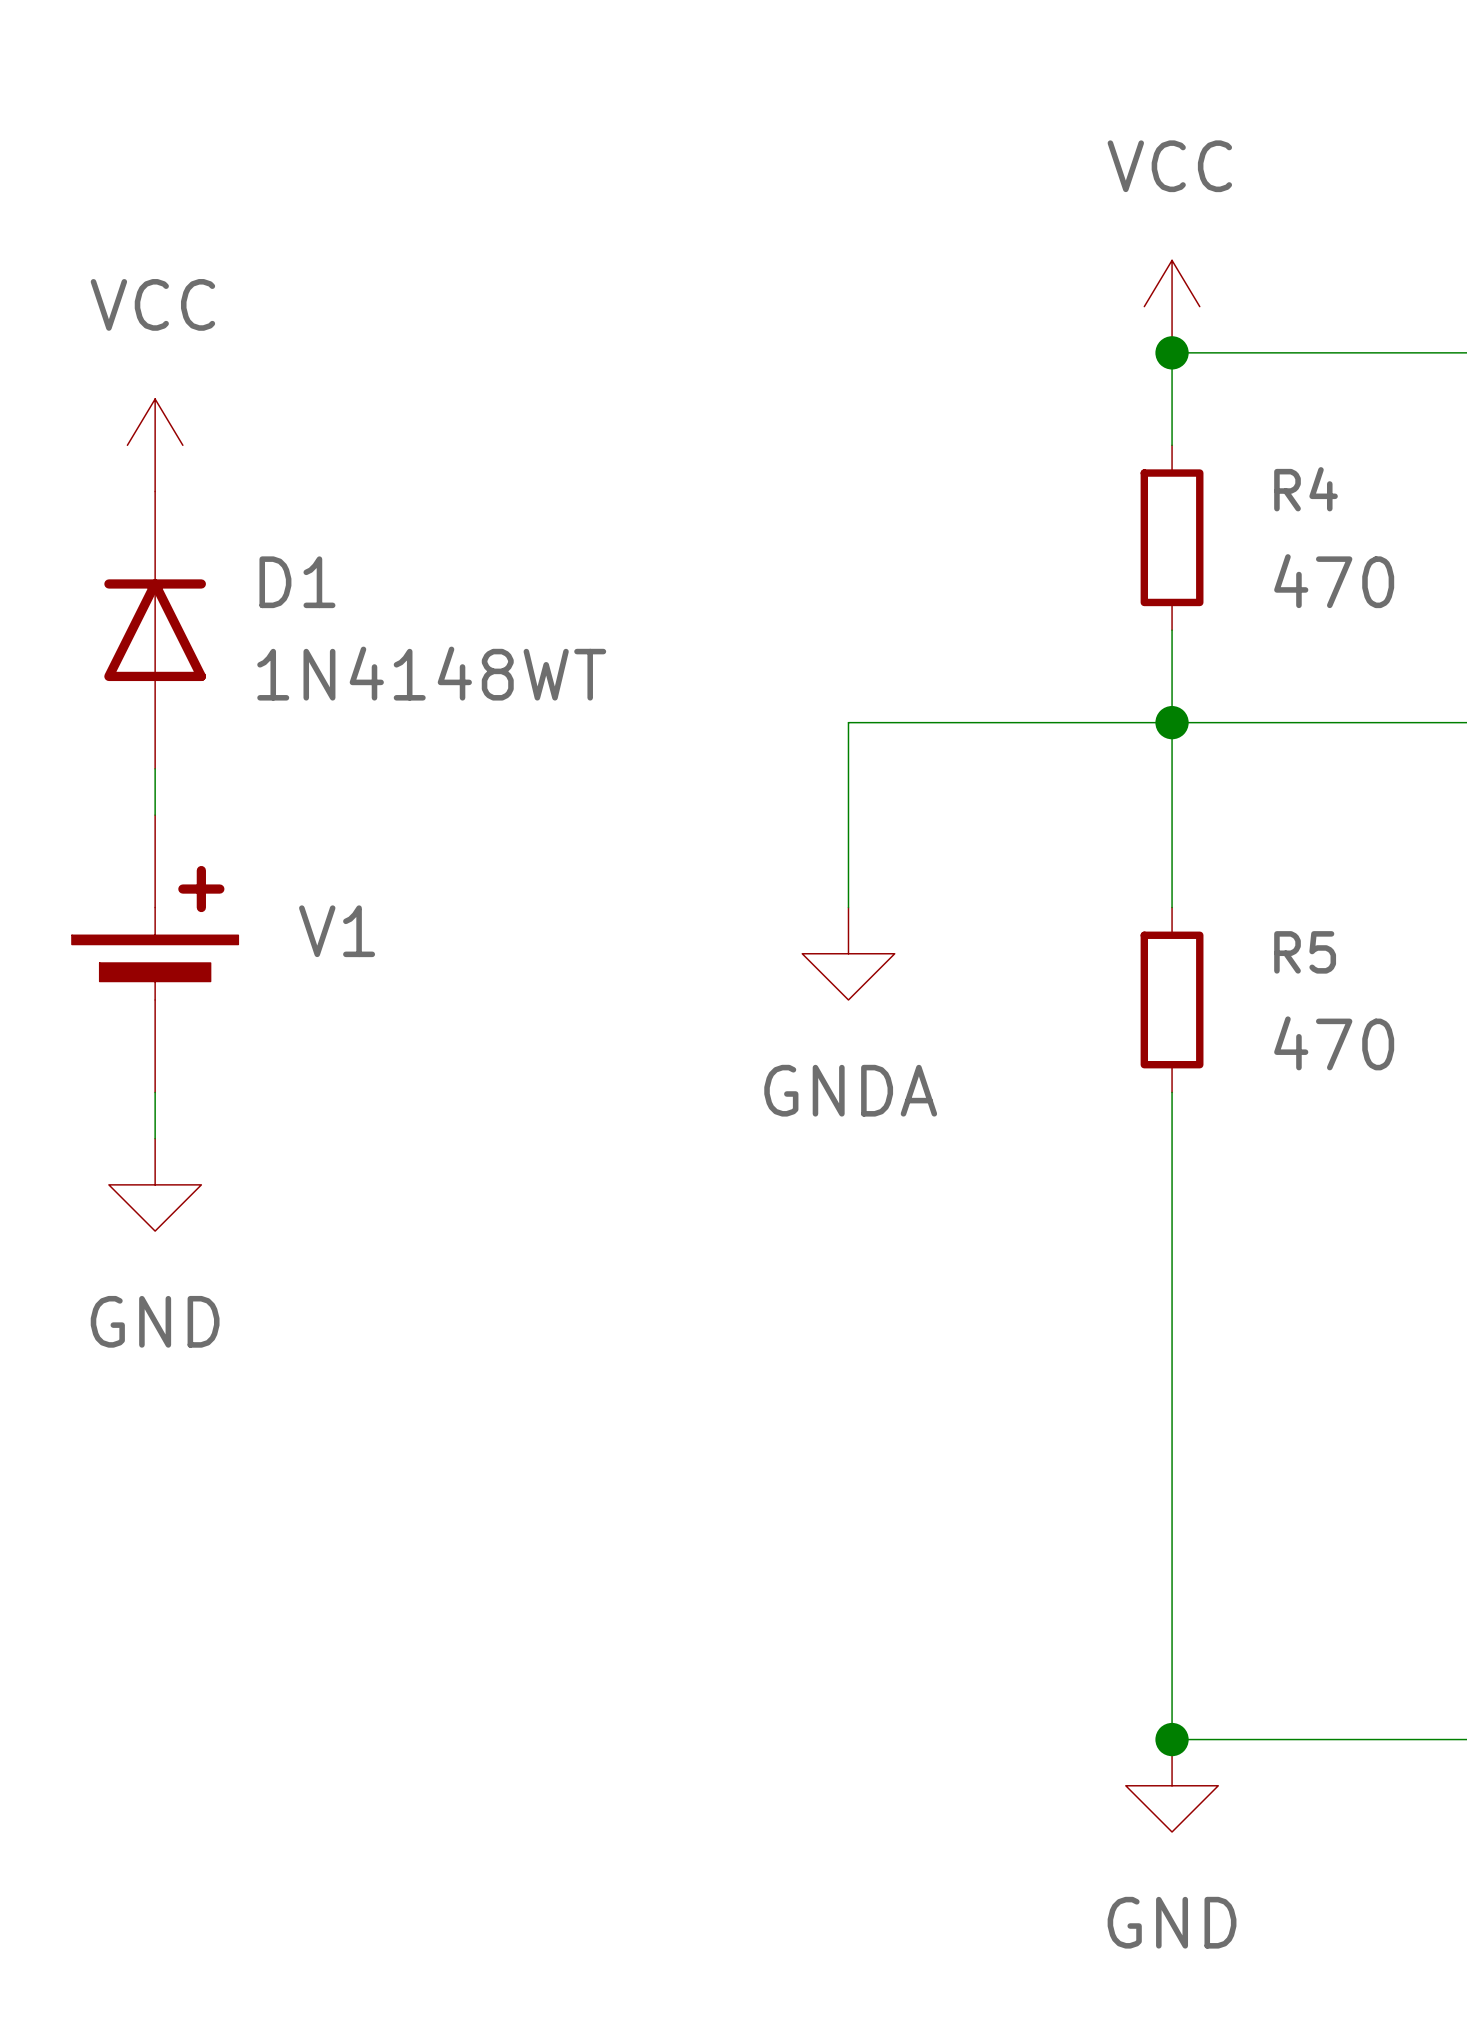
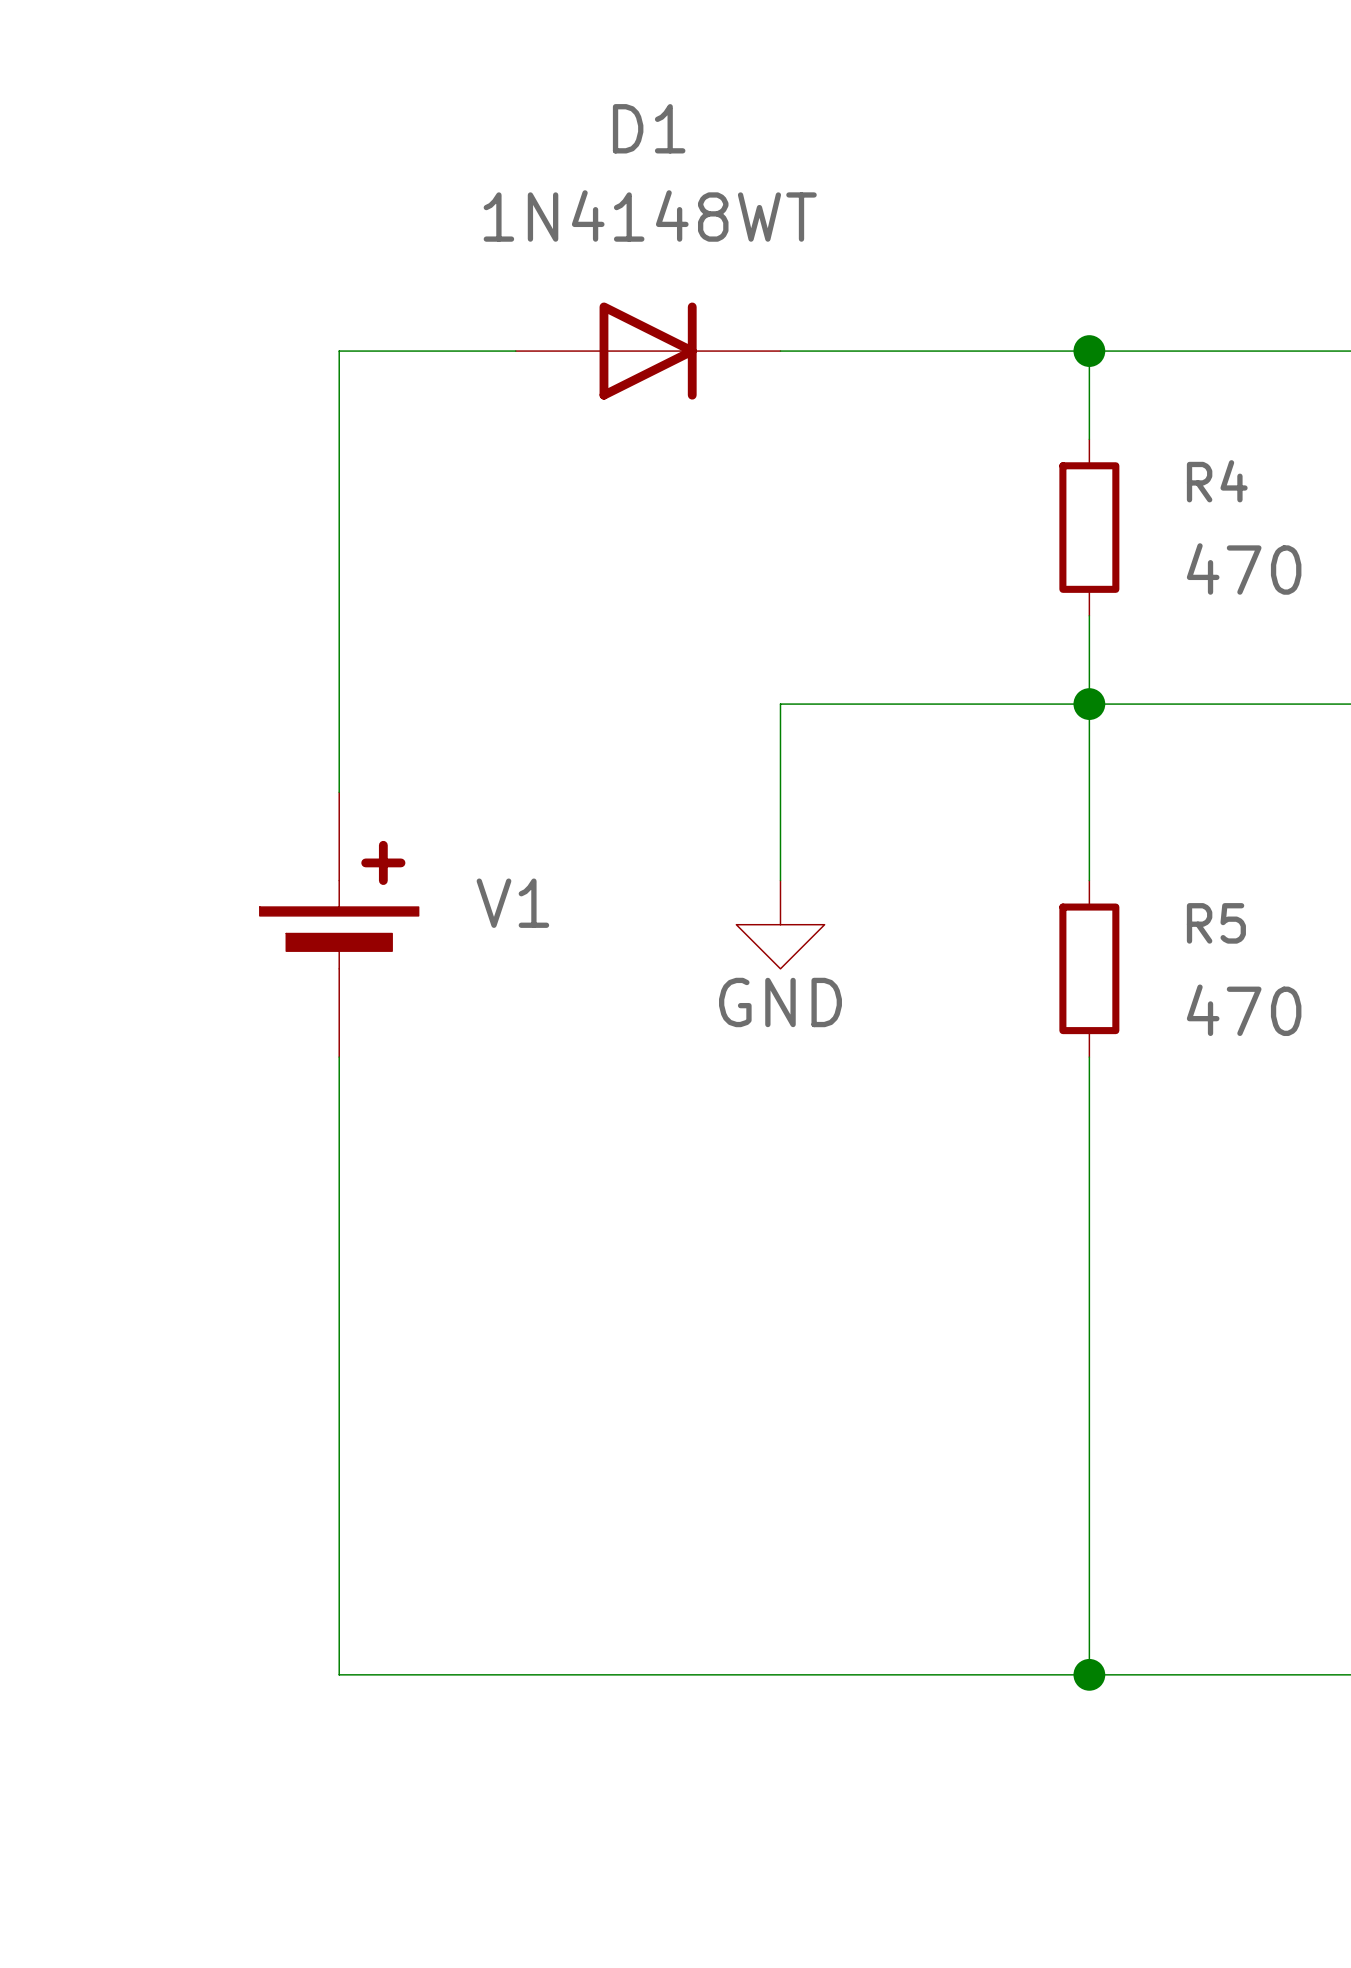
power symbol: VCC (1172, 306) -> none
wire: none -> (515, 351) (339, 351) (339, 792)
wire: none -> (780, 351) (1089, 351)
power symbol: VCC (155, 445) -> none
D1 name position: D1 (297, 582) -> D1 (649, 128)
D1 rotation: 0° (155, 630) -> 90° clockwise (648, 351)
D1 position: (155, 630) -> (648, 351)
D1 value position: 1N4148WT (431, 673) -> 1N4148WT (650, 215)
wire: (155, 768) (155, 815) -> none
V1 position: (155, 953) -> (339, 924)
power symbol: GNDA (848, 953) -> GND (780, 924)
wire: (155, 1092) (155, 1138) -> none
wire: none -> (339, 1057) (339, 1674) (1089, 1674)
power symbol: GND (155, 1184) -> none
power symbol: GND (1172, 1785) -> none

